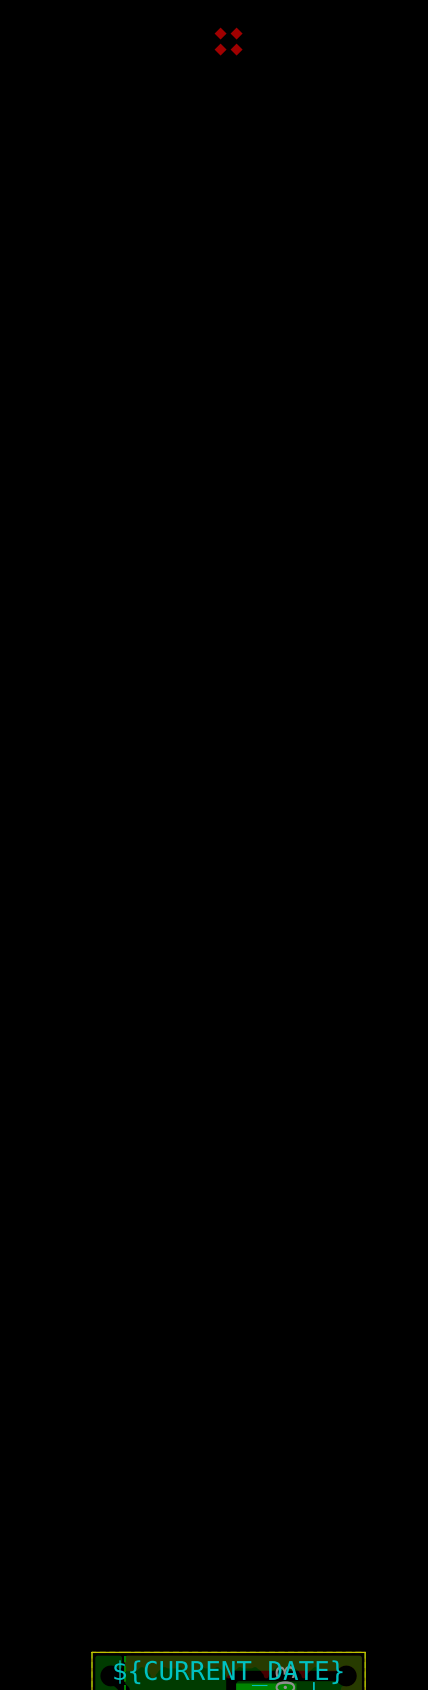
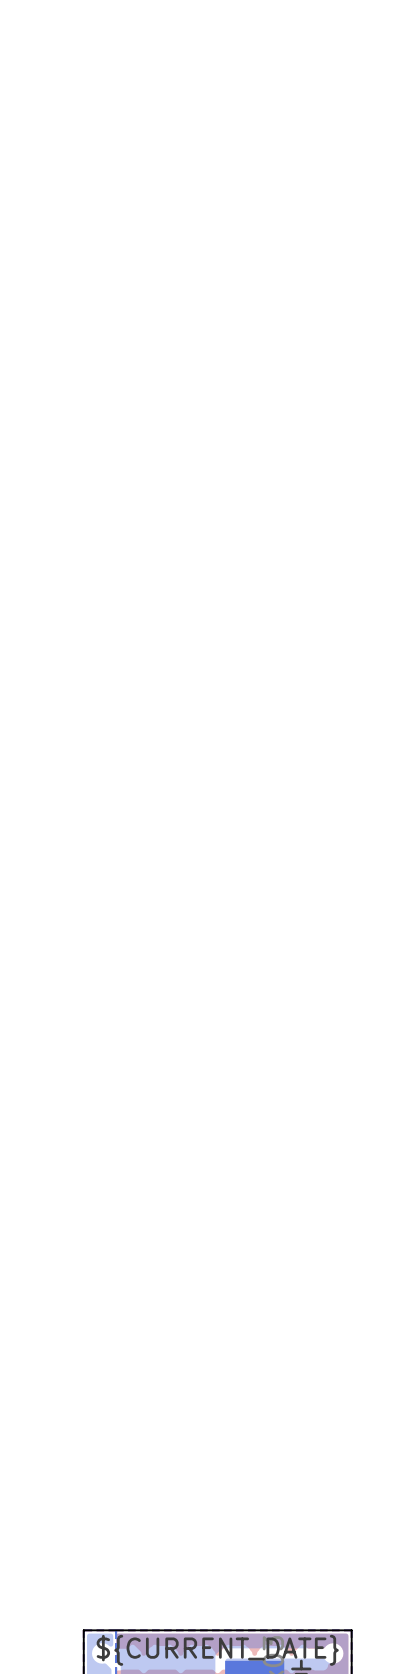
part: (228, 41) -> none

